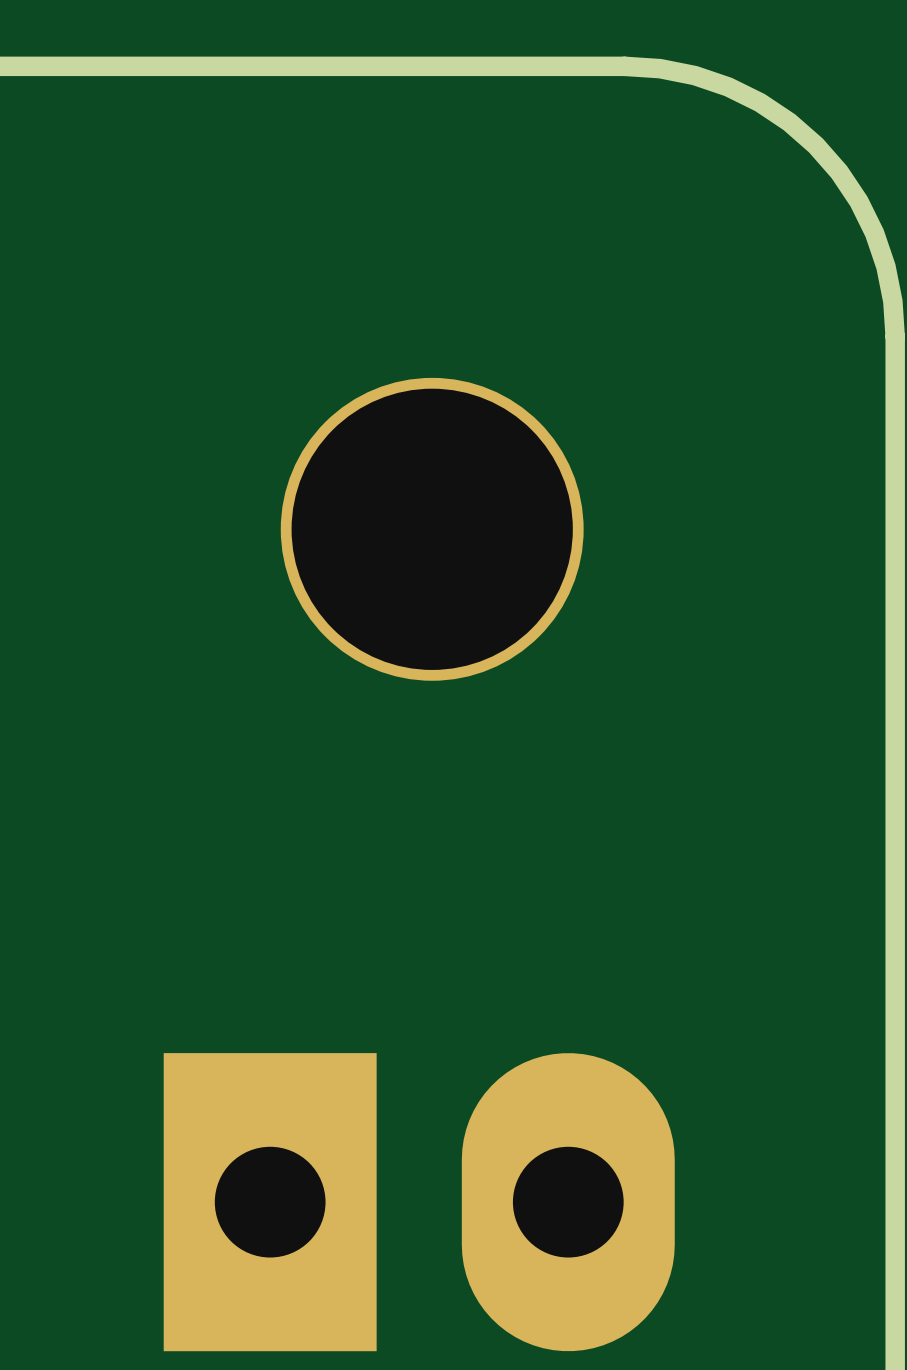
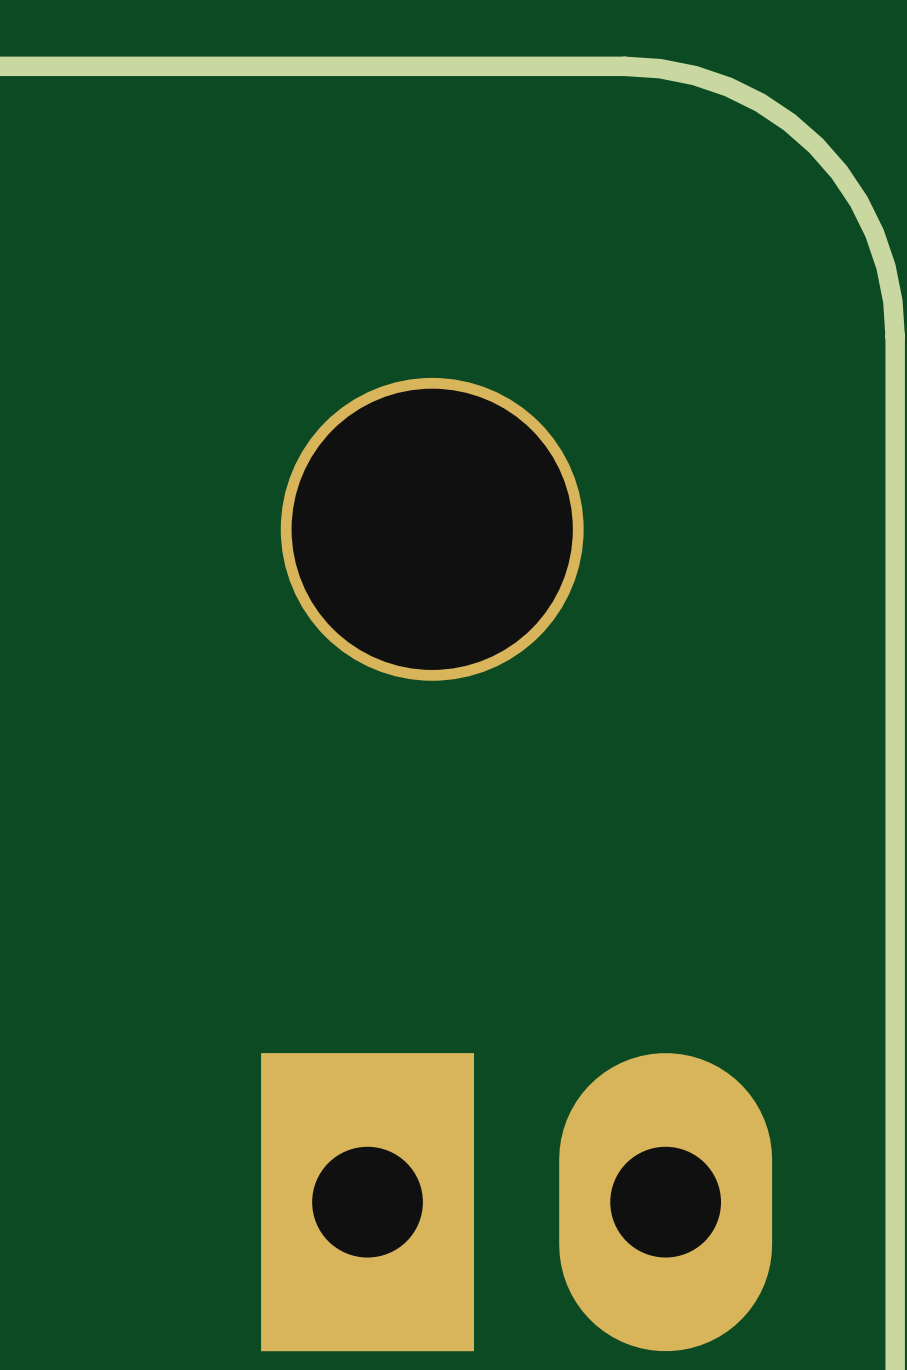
part position: (419, 1202) -> (516, 1202)

